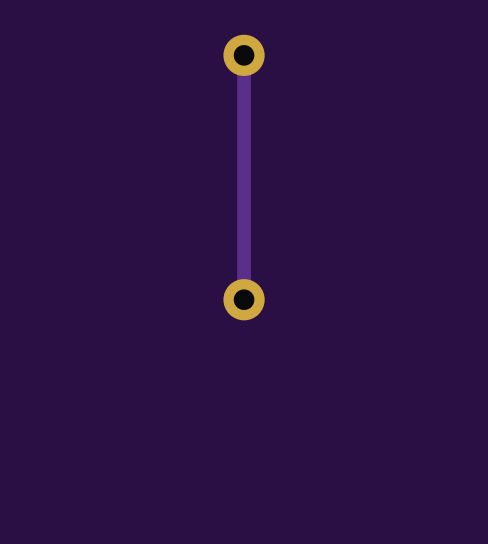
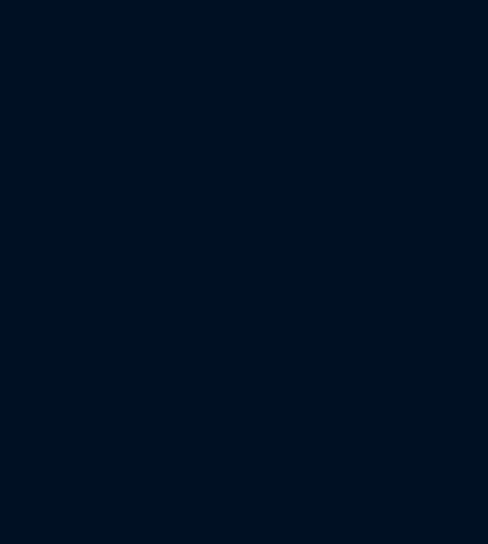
track: (244, 55) (244, 299) -> none
via: (244, 55) -> none
via: (244, 299) -> none

